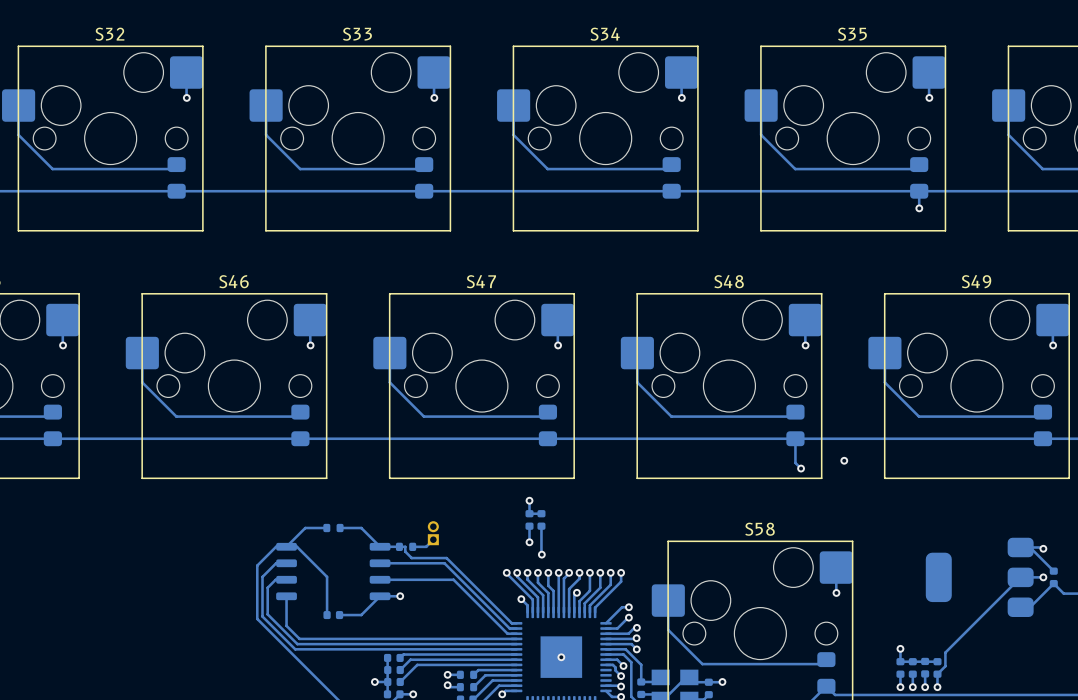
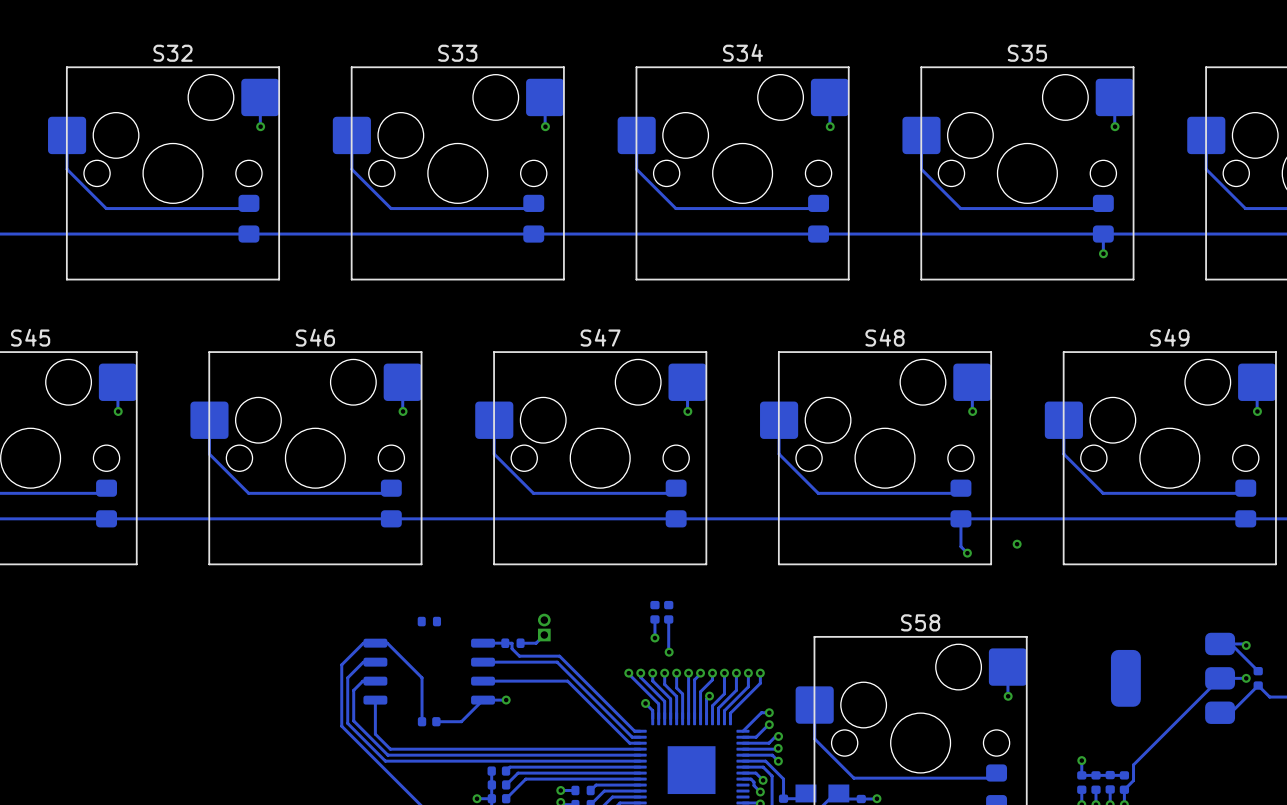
bottom track: (529, 500) (529, 513) (541, 513) -> none
via: (529, 500) -> none
bottom track: (326, 528) (305, 528) (286, 546) -> none
bottom track: (340, 528) (361, 528) (380, 546) -> none
via: (561, 657) -> none

